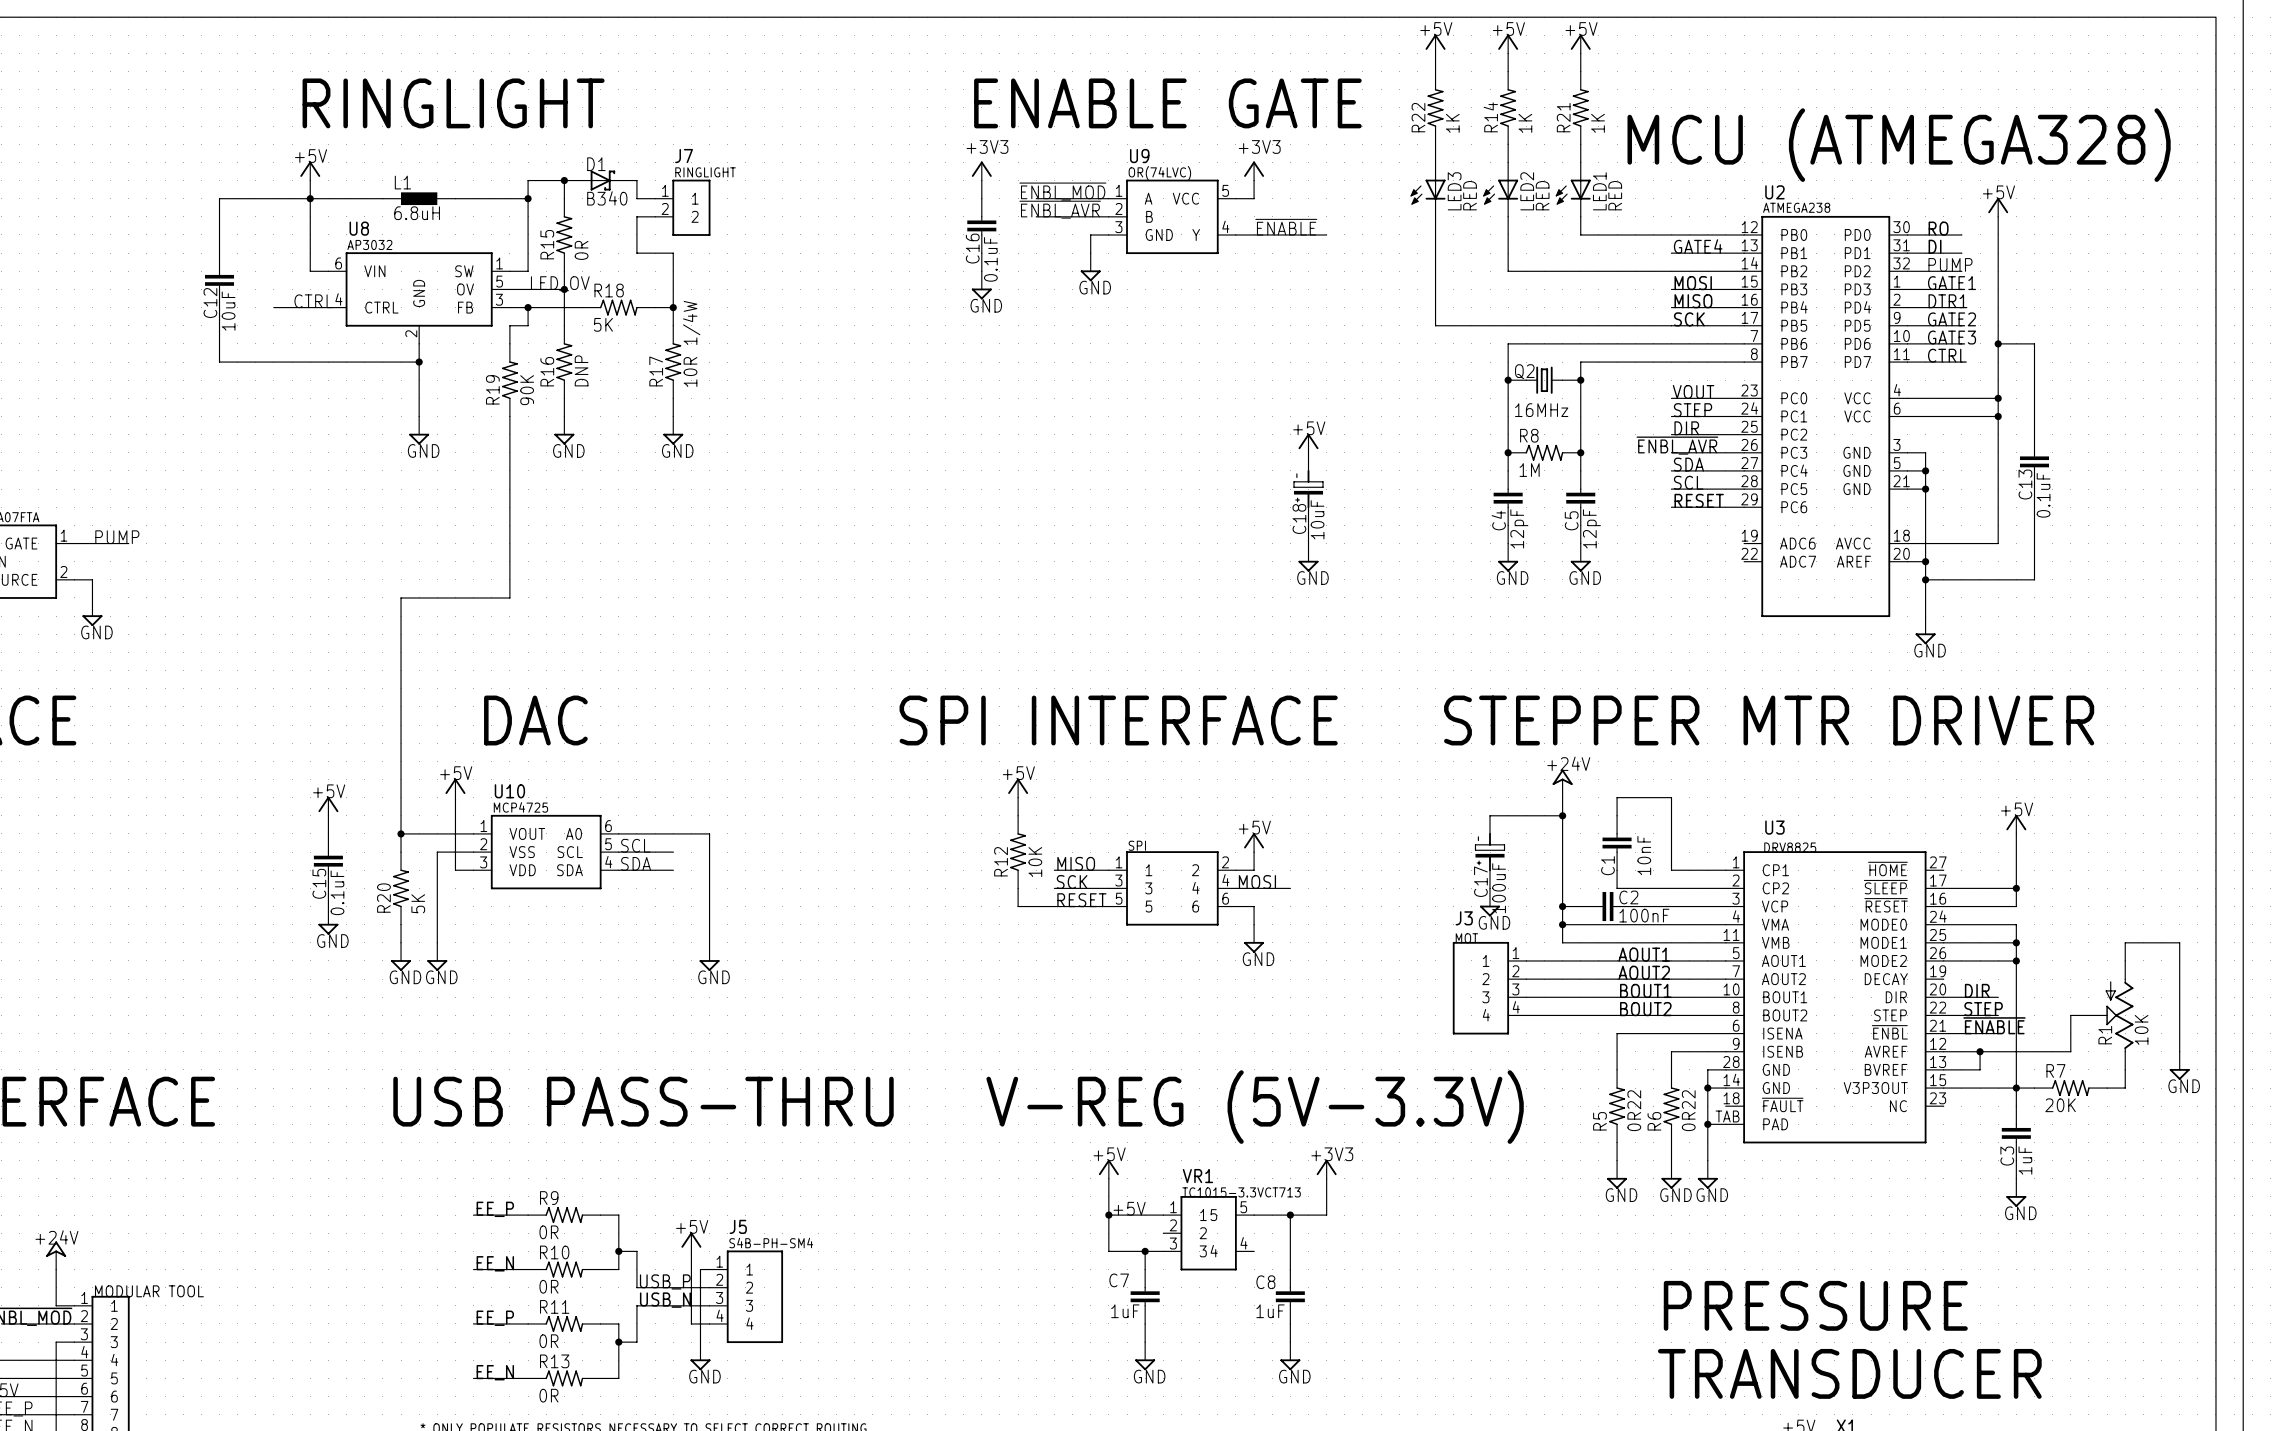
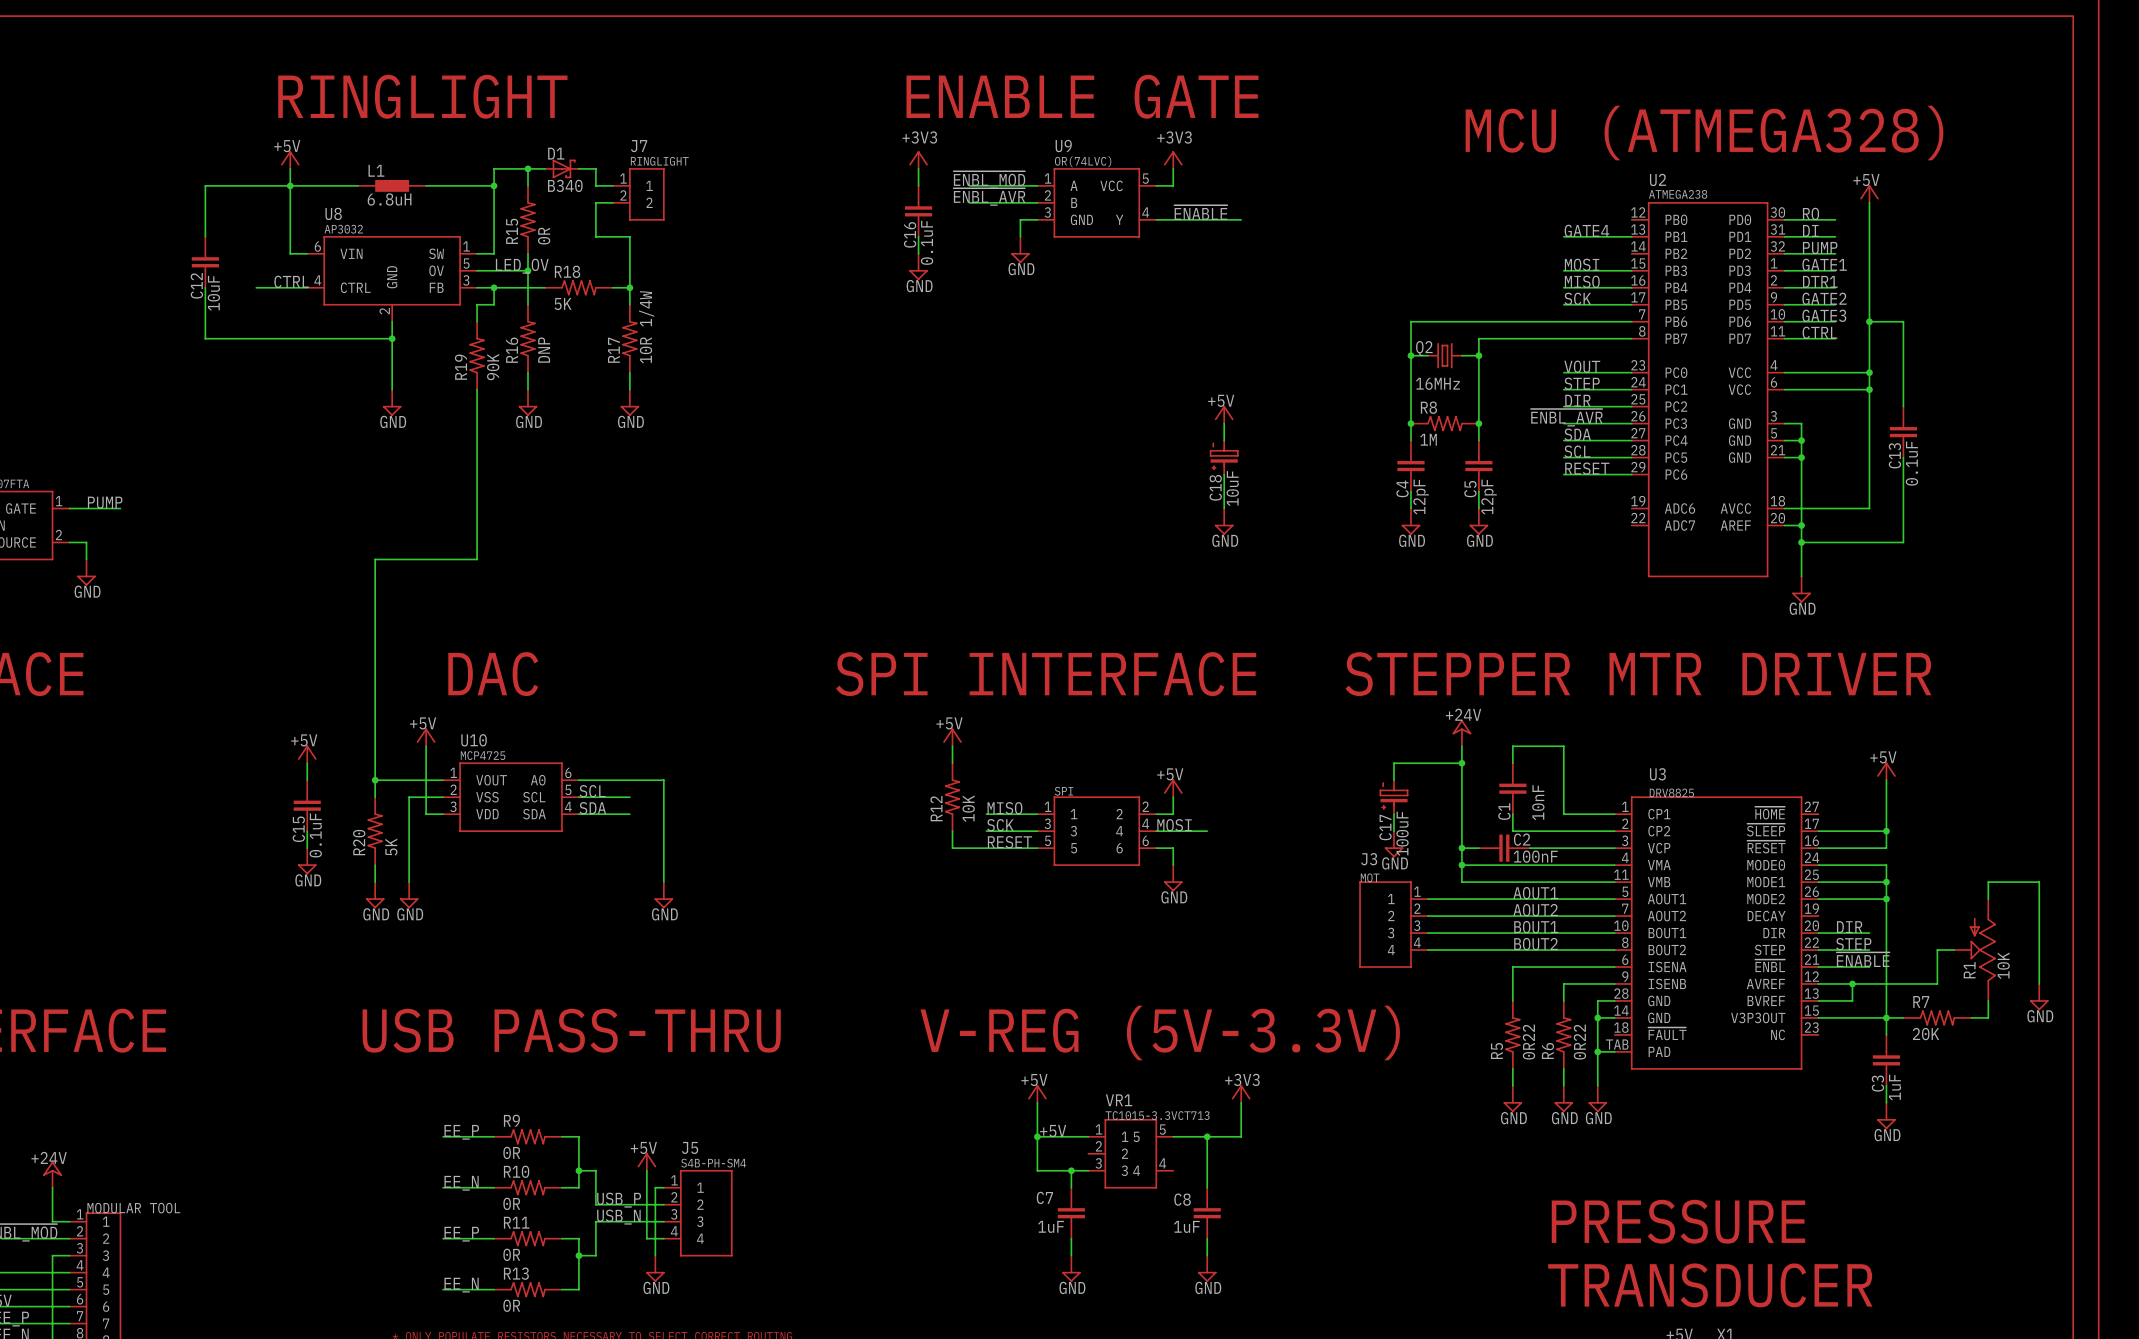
power symbol: +5V (1435, 43) -> none
power symbol: +5V (1508, 43) -> none
power symbol: +5V (1580, 43) -> none
wire: (1435, 53) (1435, 71) -> none
wire: (1508, 53) (1508, 71) -> none
wire: (1580, 53) (1580, 71) -> none
R22: 1K (1435, 107) -> none
R14: 1K (1508, 107) -> none
R21: 1K (1580, 107) -> none
wire: (1435, 144) (1435, 162) -> none
wire: (1508, 144) (1508, 162) -> none
wire: (1580, 144) (1580, 162) -> none
text position: MCU (ATMEGA328) (1899, 145) -> MCU (ATMEGA328) (1704, 133)
LED3: RED (1428, 189) -> none
LED2: RED (1500, 189) -> none
LED1: RED (1573, 189) -> none
wire: (1435, 216) (1435, 325) (1671, 325) -> none
wire: (1508, 216) (1508, 271) (1744, 271) -> none
wire: (1580, 216) (1580, 234) (1744, 234) -> none

